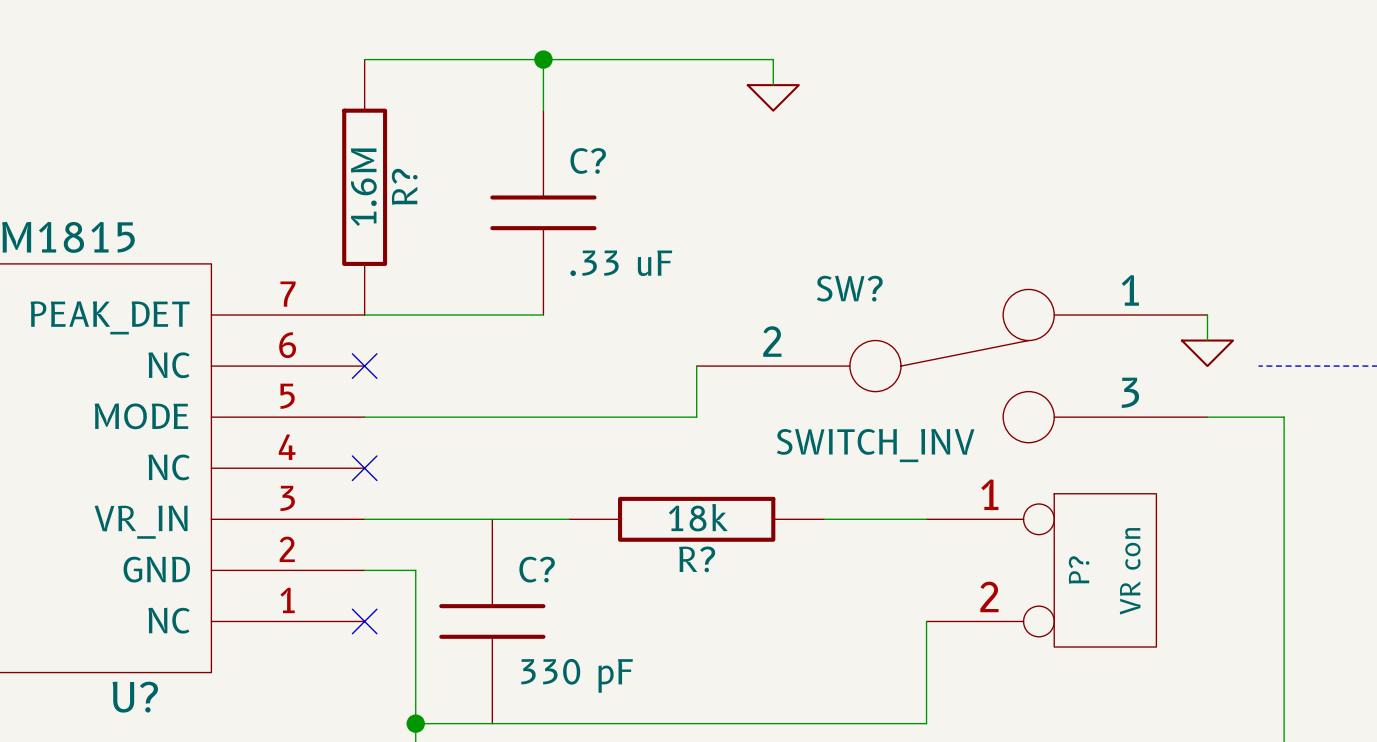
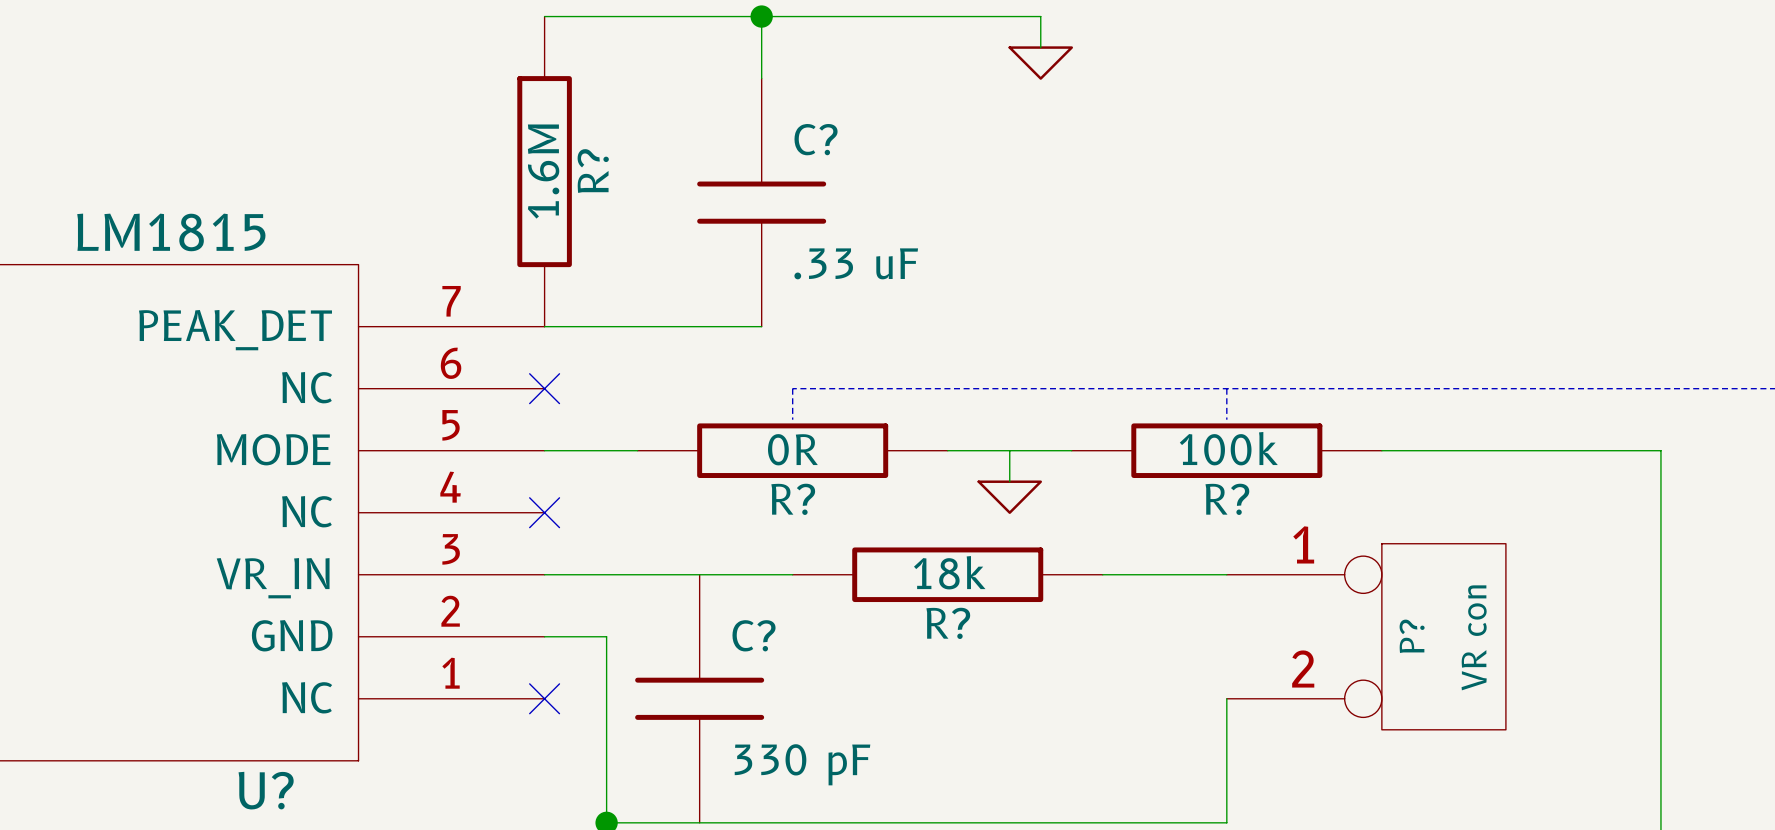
wire: (1207, 314) (1207, 340) -> (1009, 450) (1009, 481)
power symbol position: (1207, 353) -> (1009, 497)
wire: (696, 366) (696, 417) (441, 417) -> none
line: none -> (1226, 388) (1226, 419)
SW?: SWITCH_INV (952, 366) -> none
line: none -> (1629, 388) (792, 388) (792, 419)
R?: none -> 0R (792, 450)
wire: none -> (947, 450) (1071, 450)
R?: none -> 100k (1226, 450)

